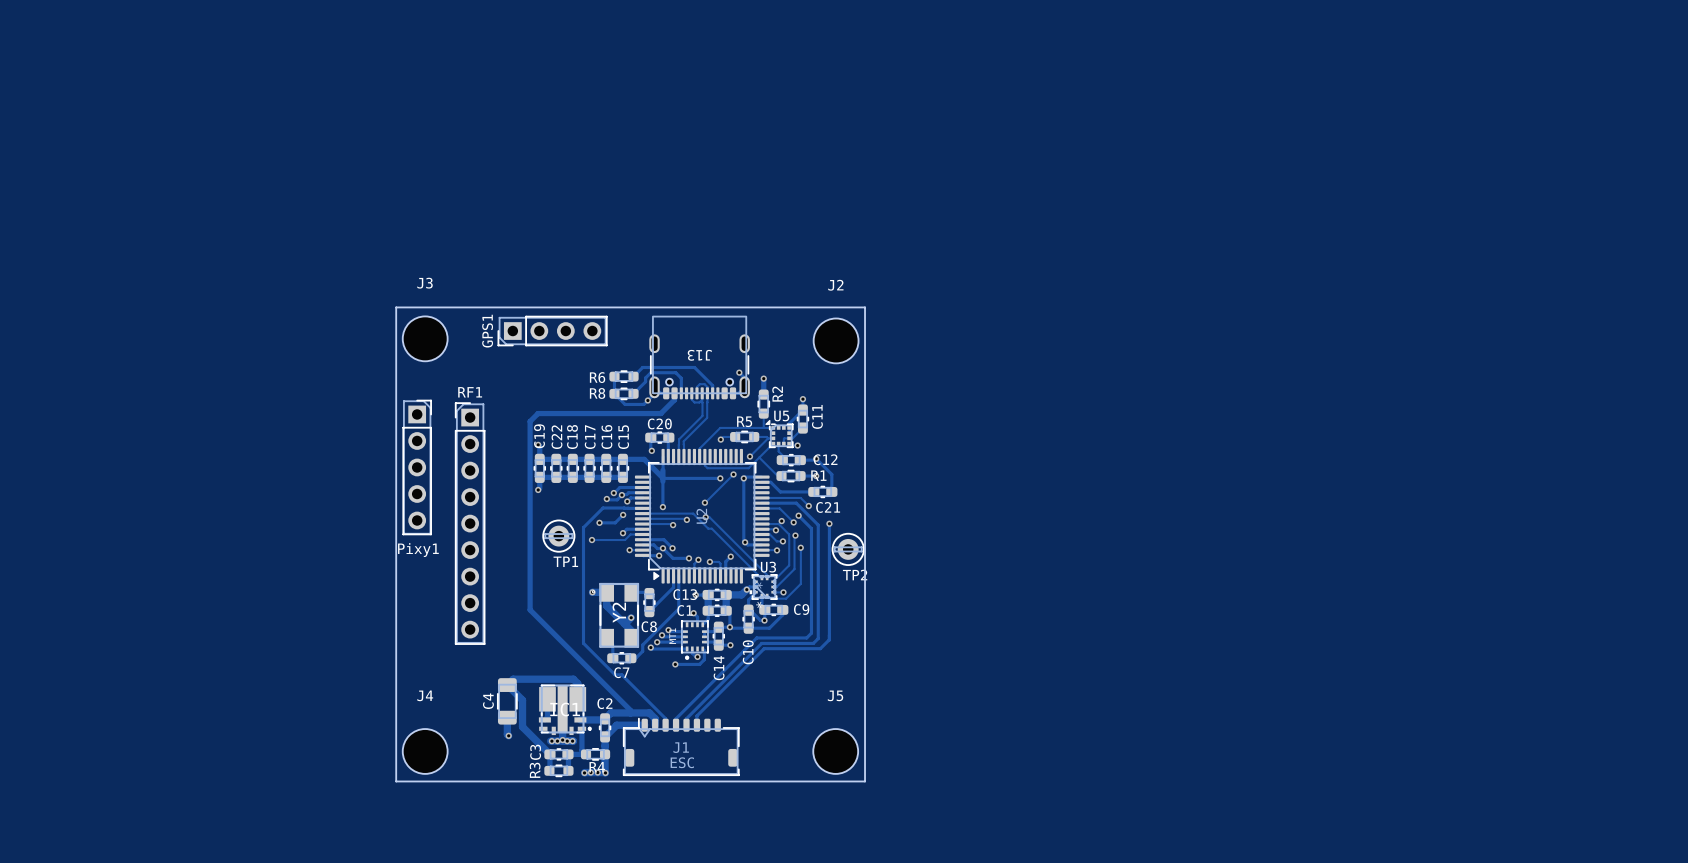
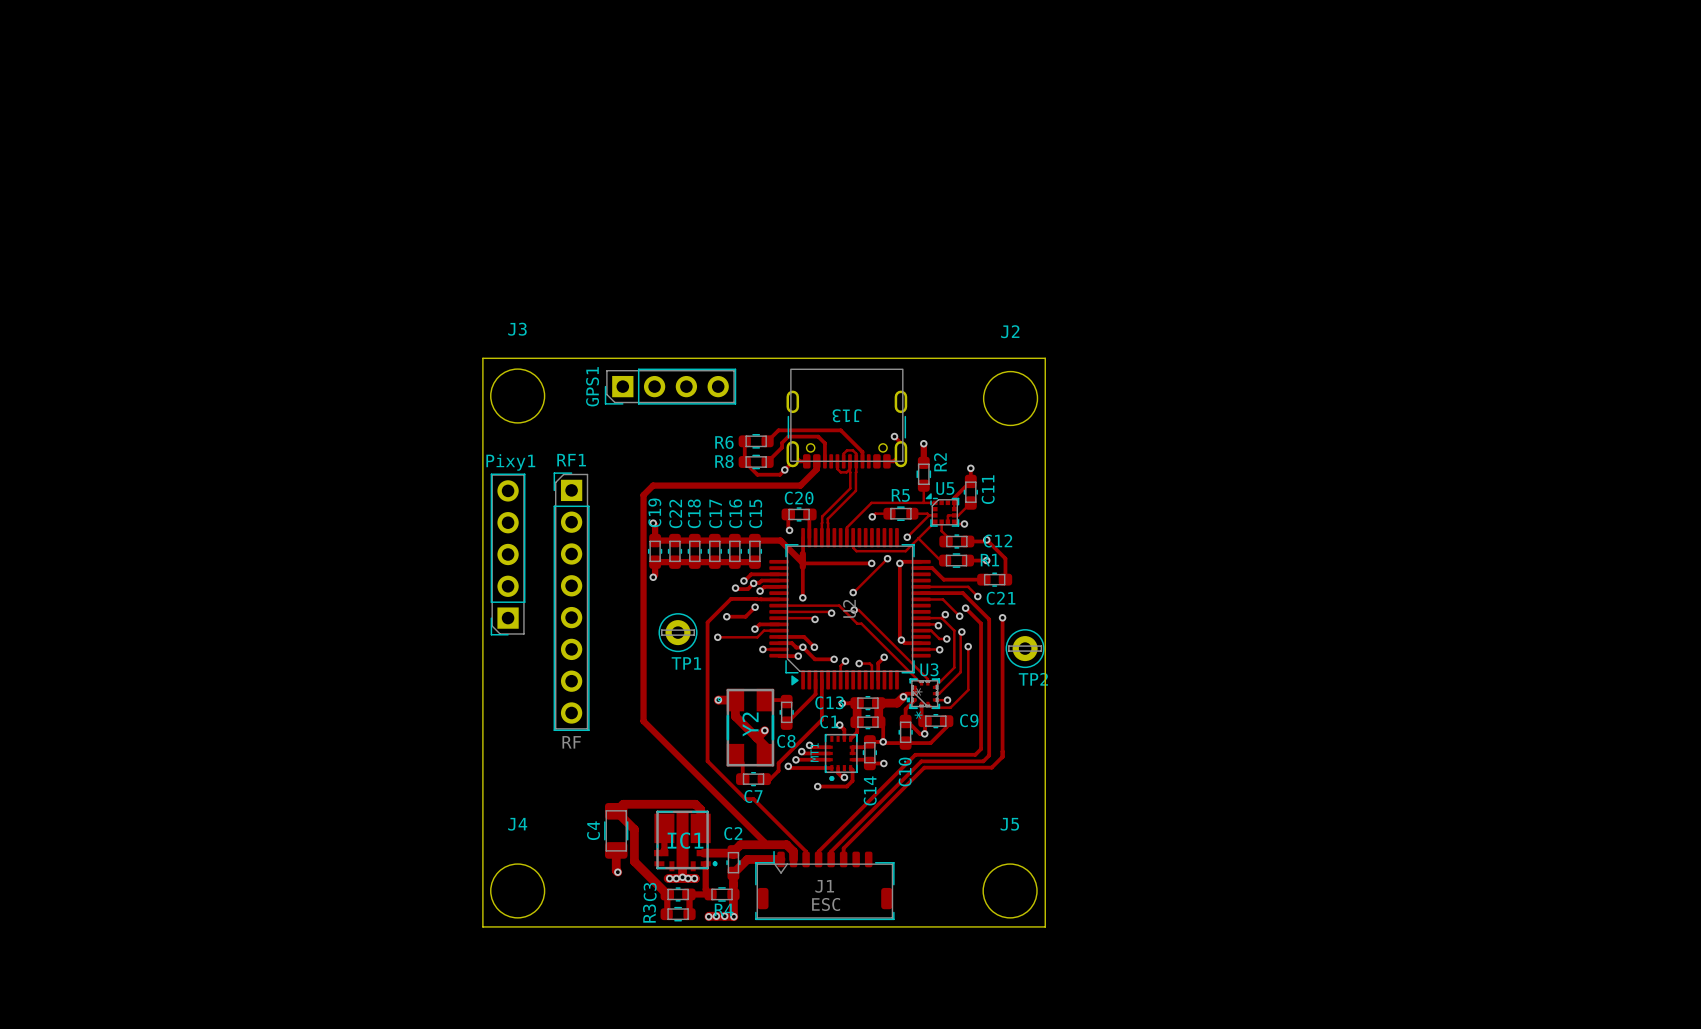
RF1 footprint: [455, 402, 486, 645] -> [553, 472, 590, 732]
Pixy1 rotation: 0° (417, 467) -> 180° (508, 554)
RF1 value: none -> RF (571, 742)

